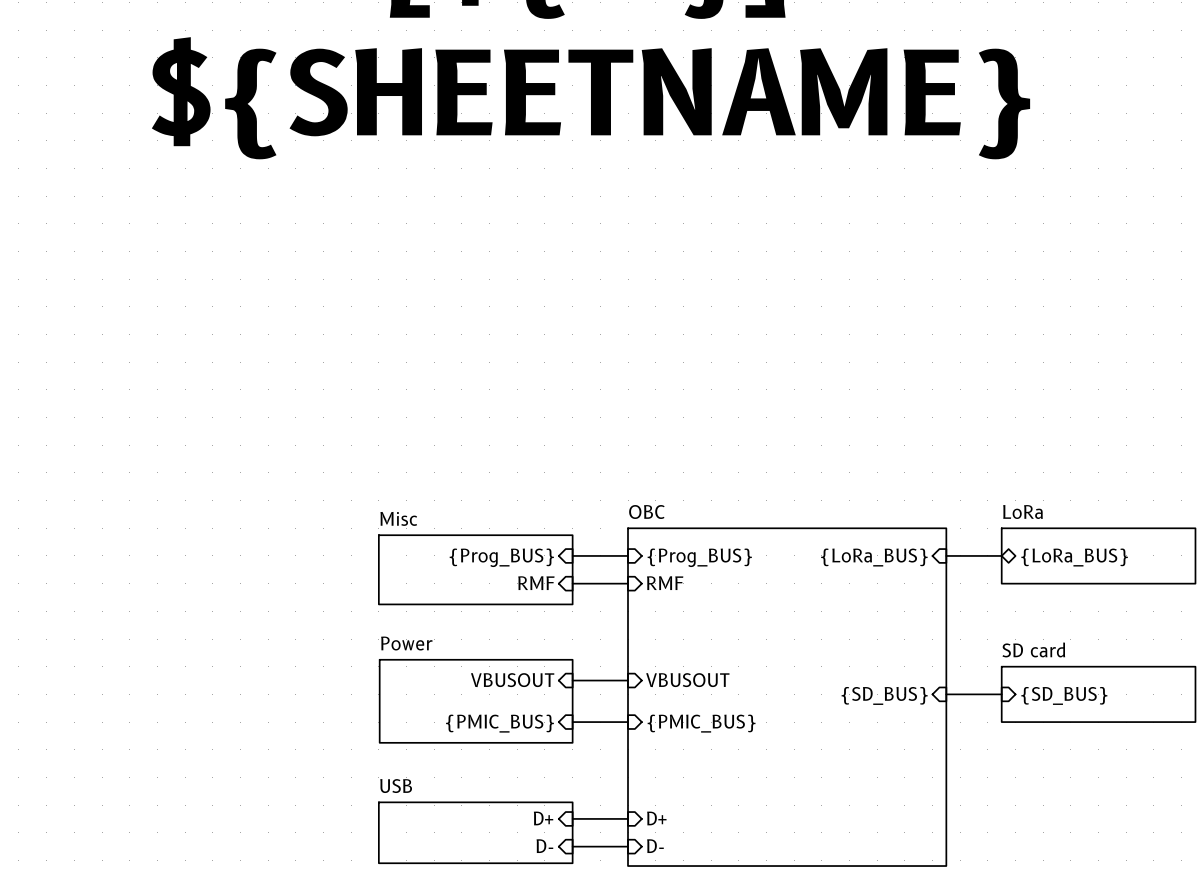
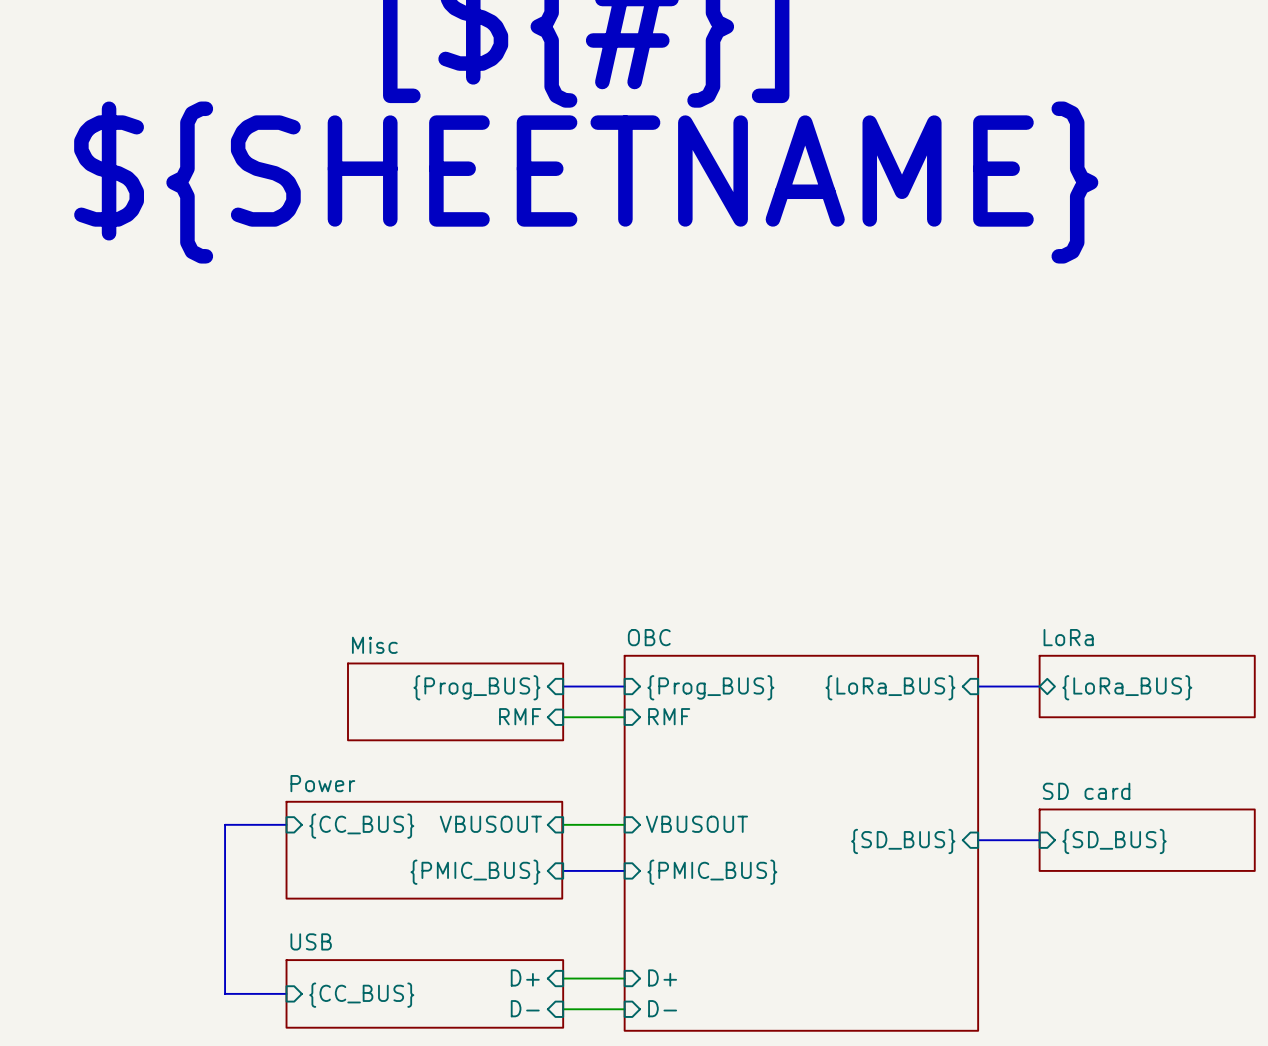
bus: none -> (286, 824) (225, 824) (225, 993) (286, 993)
sheet pin: none -> {CC_BUS} (361, 826)
sheet Power: (476, 701) -> none
sheet Power: none -> (424, 850)
sheet USB: none -> (424, 993)
sheet USB: (475, 832) -> none
sheet pin: none -> {CC_BUS} (361, 995)

